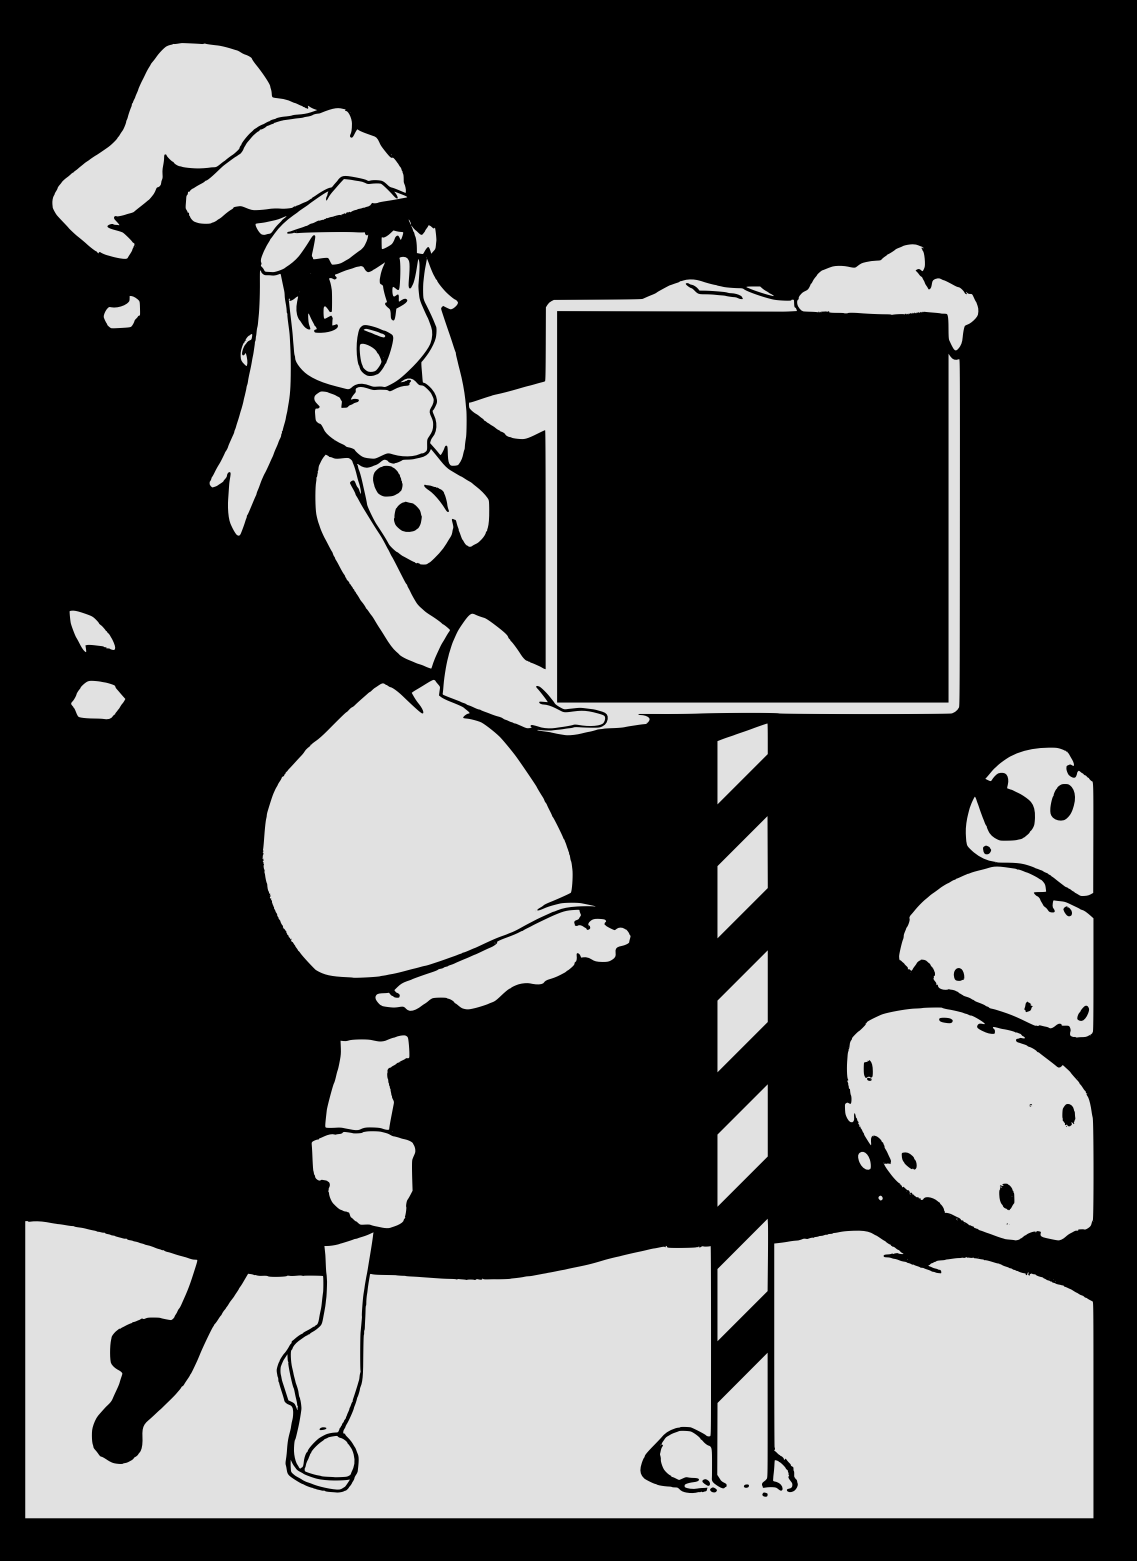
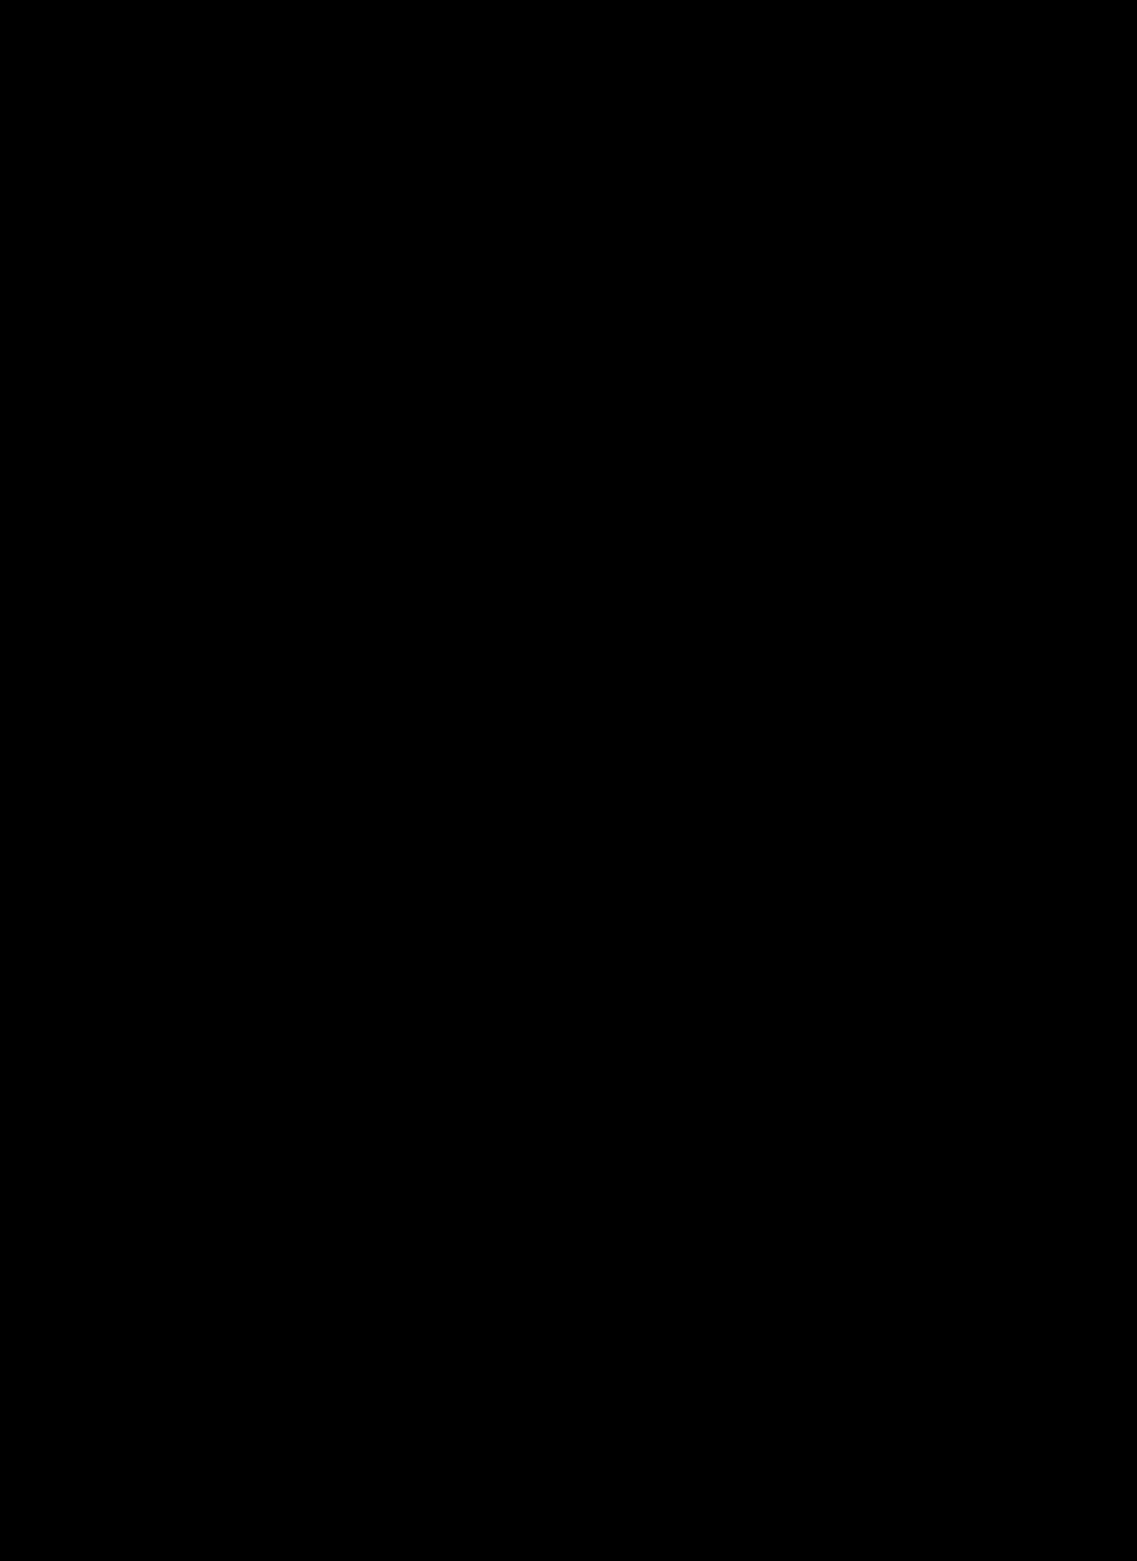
drawing: [25, 43, 1094, 1519] -> none

